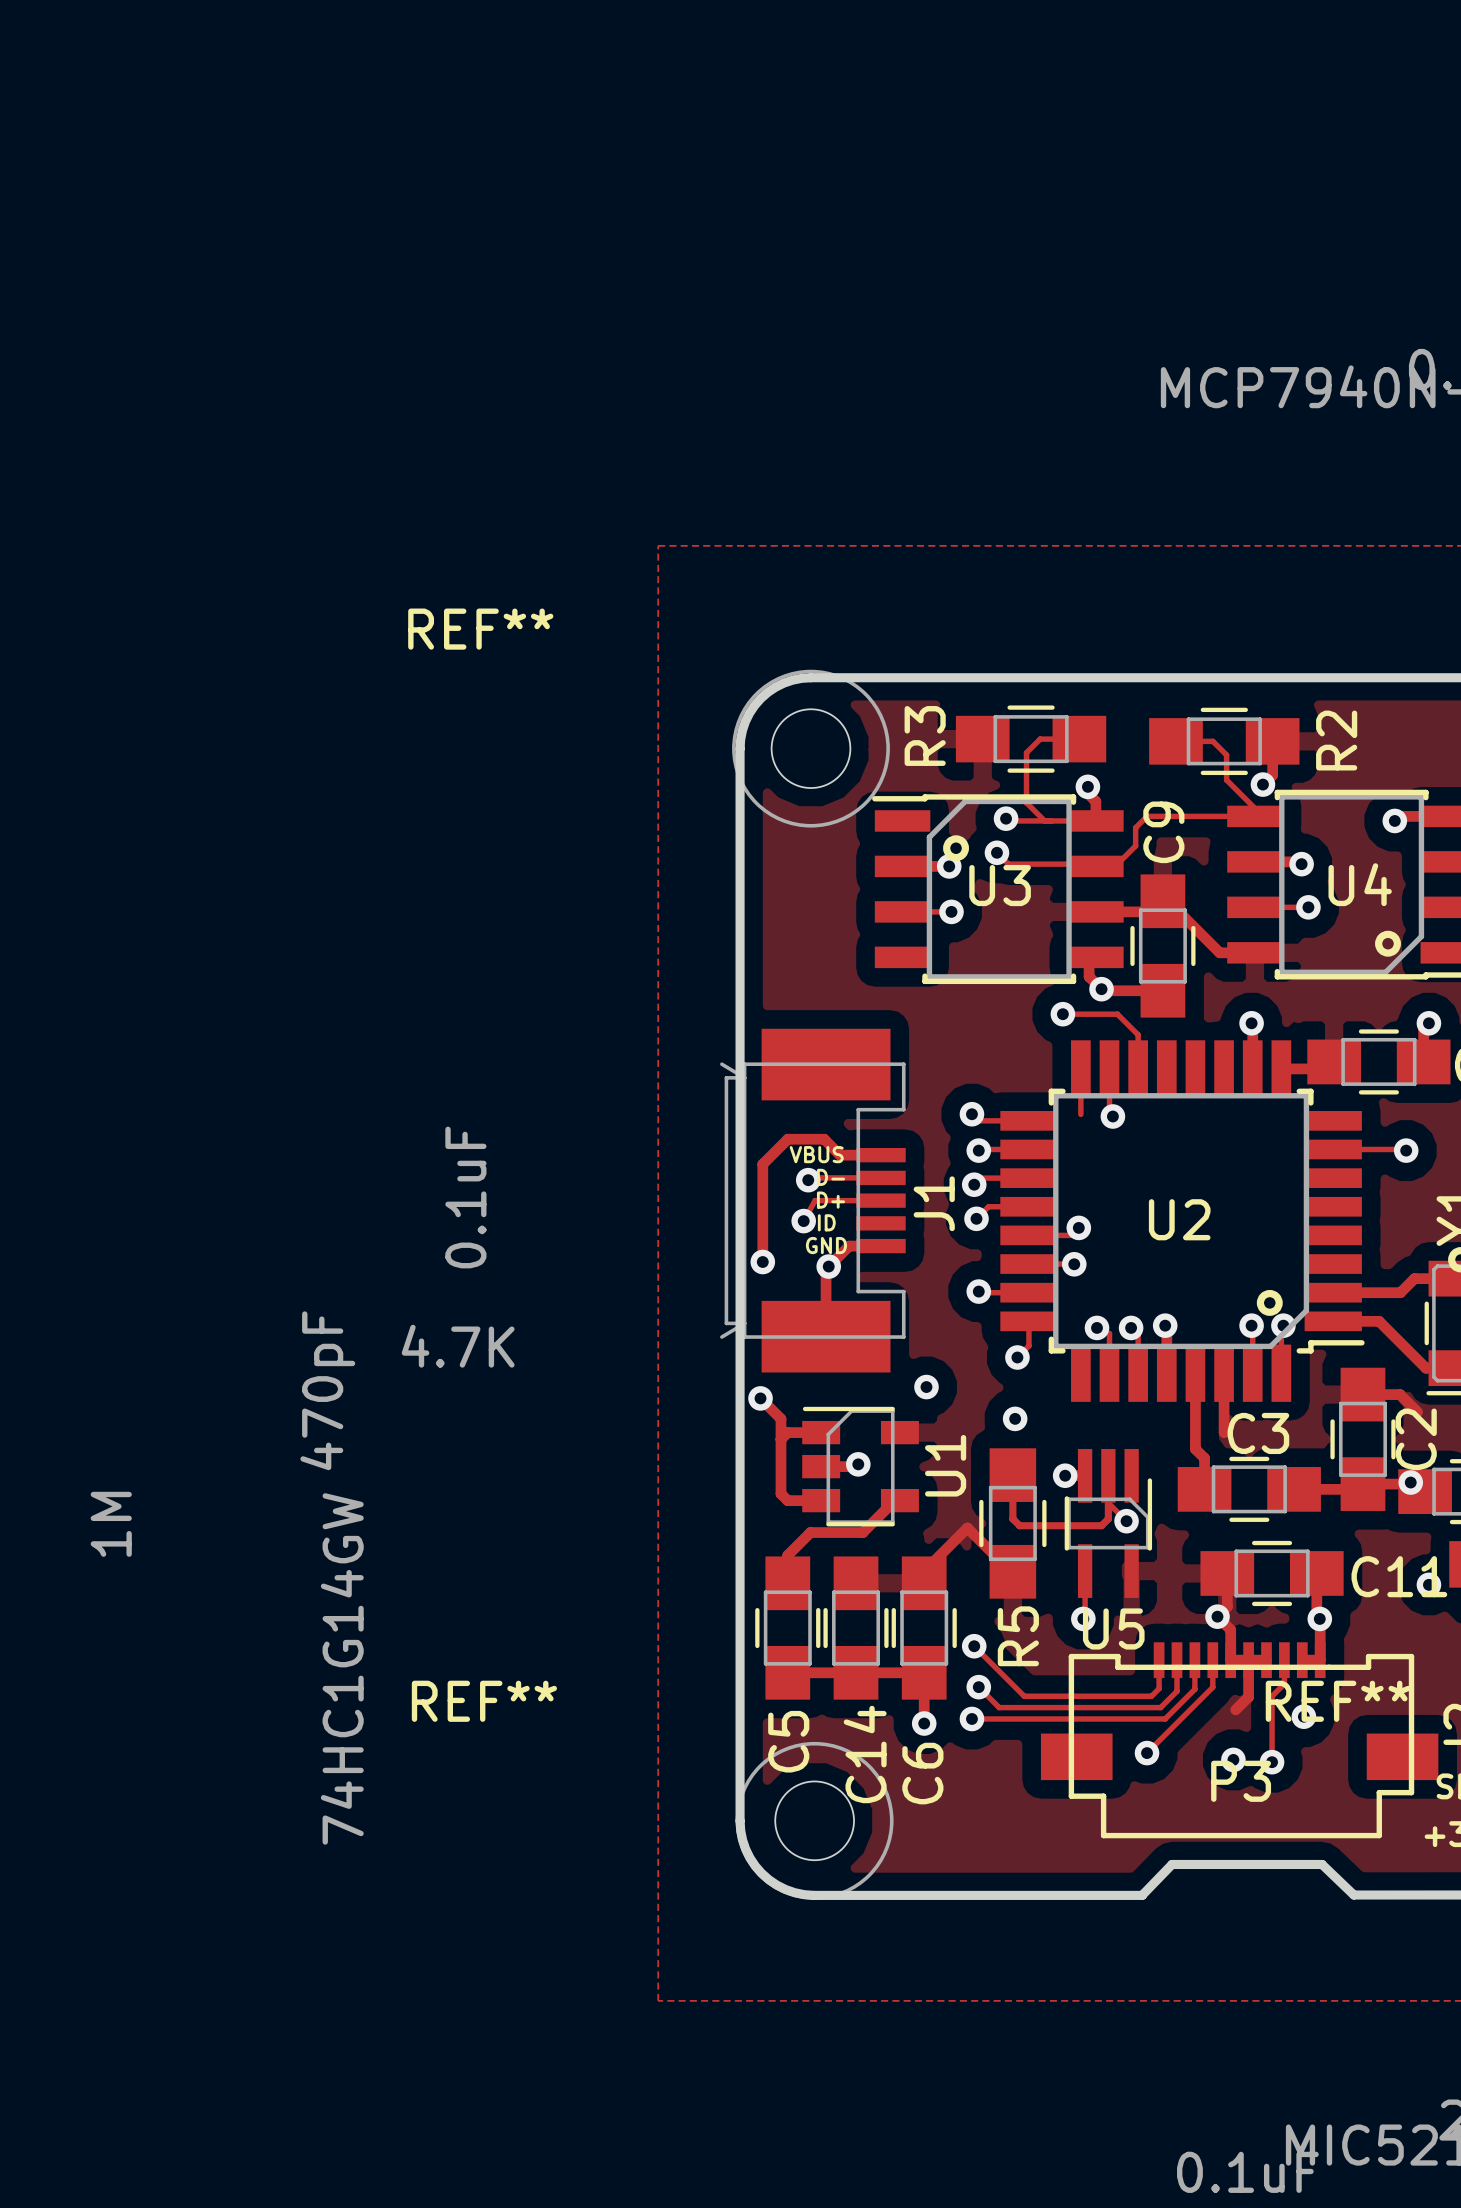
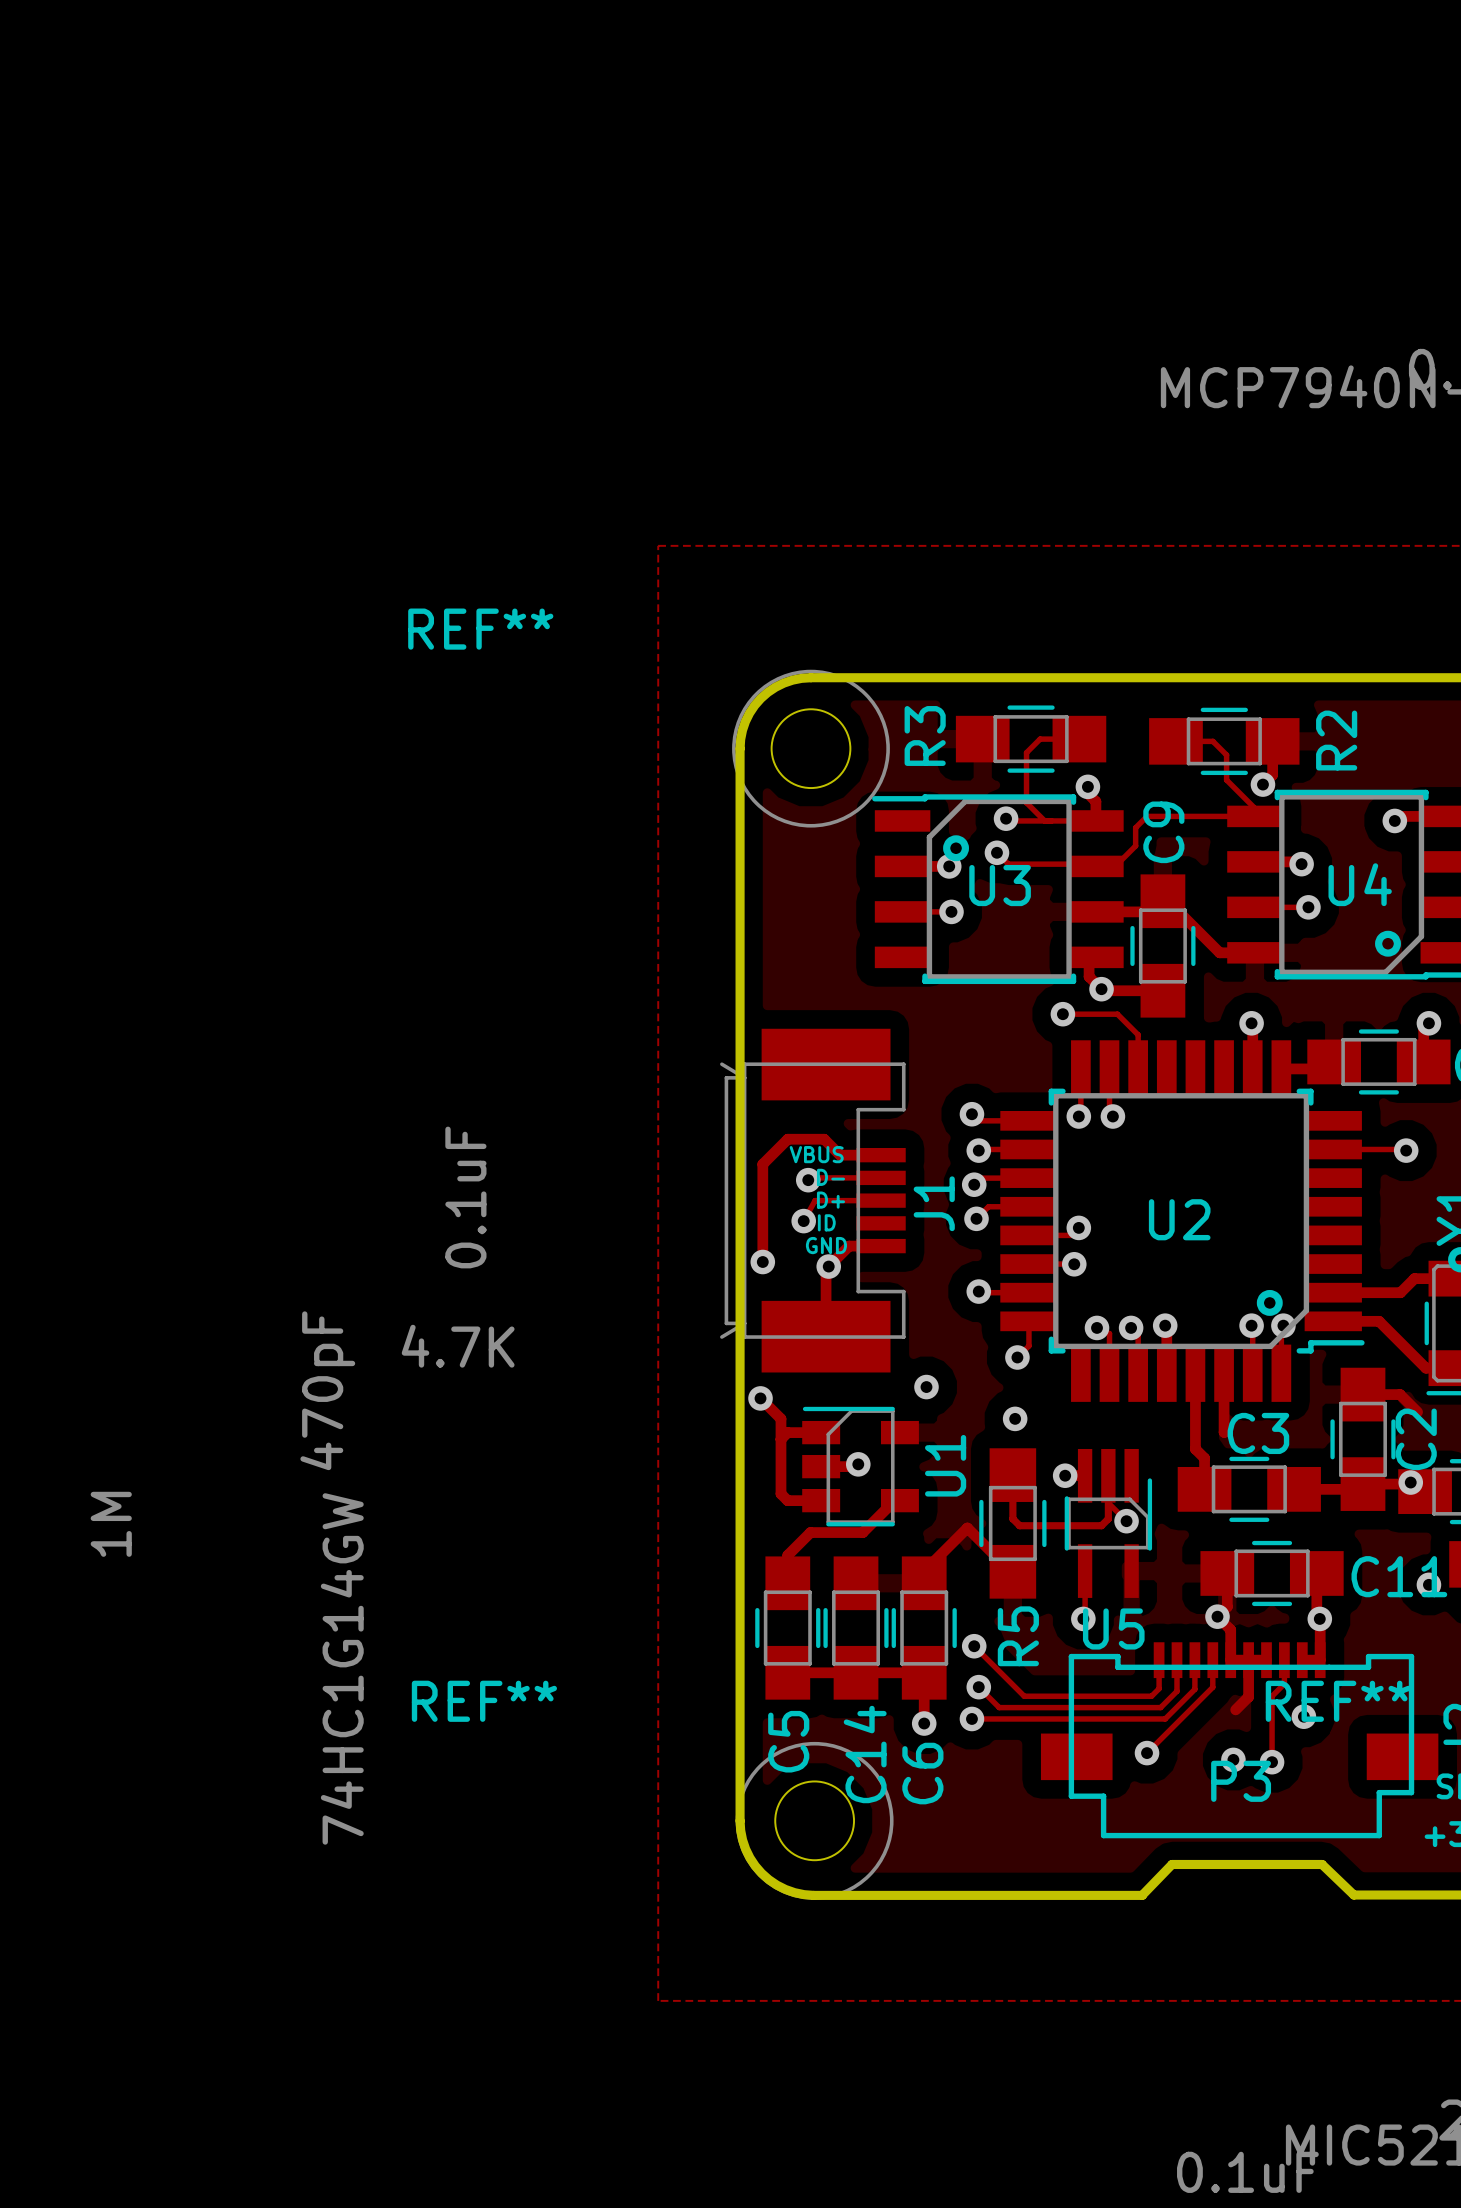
via: none -> (1078, 1116)

